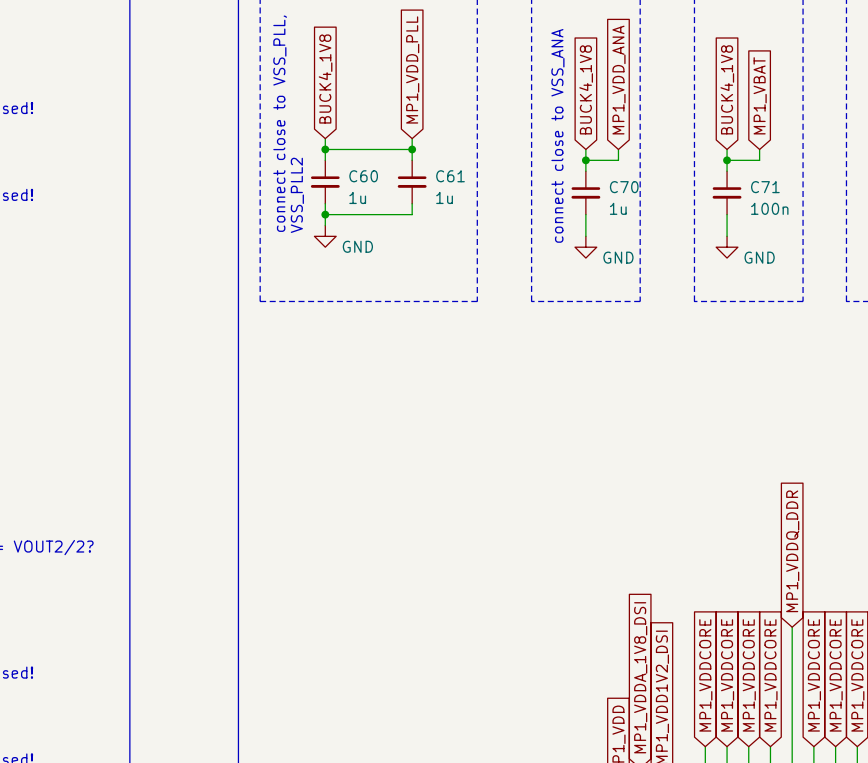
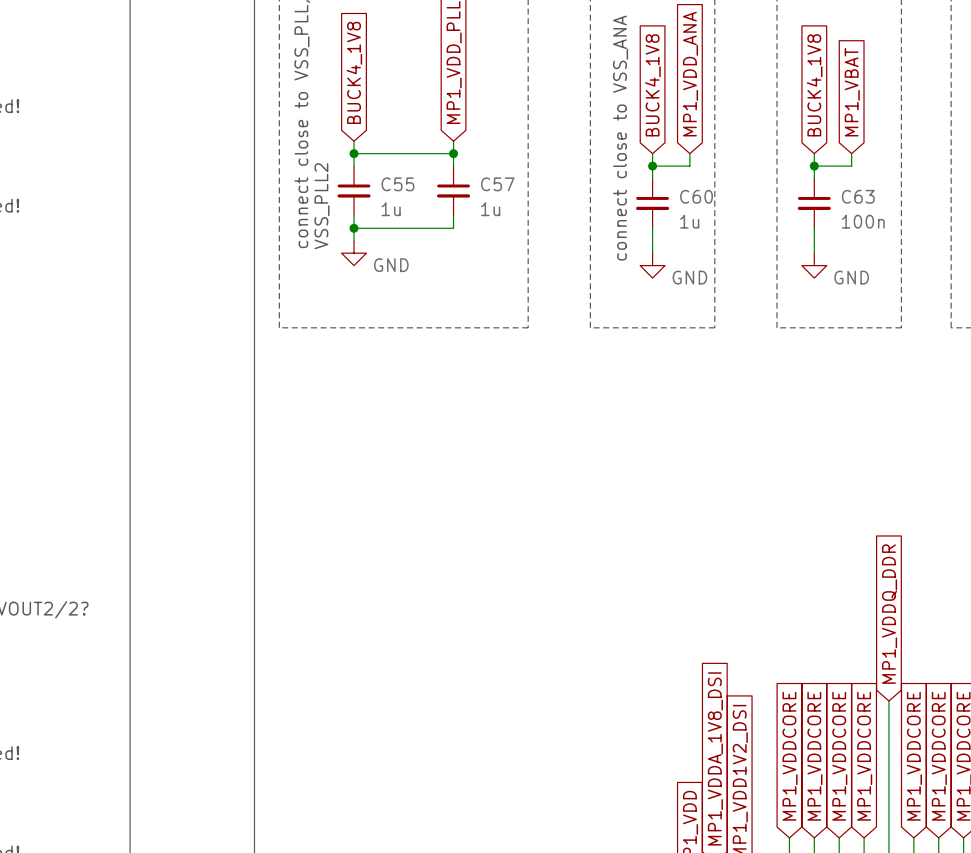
C60 name: C60 (363, 176) -> C55 (397, 184)
C61 name: C61 (450, 176) -> C57 (497, 184)
C70 name: C70 (624, 187) -> C60 (696, 196)
C71 name: C71 (765, 187) -> C63 (858, 196)

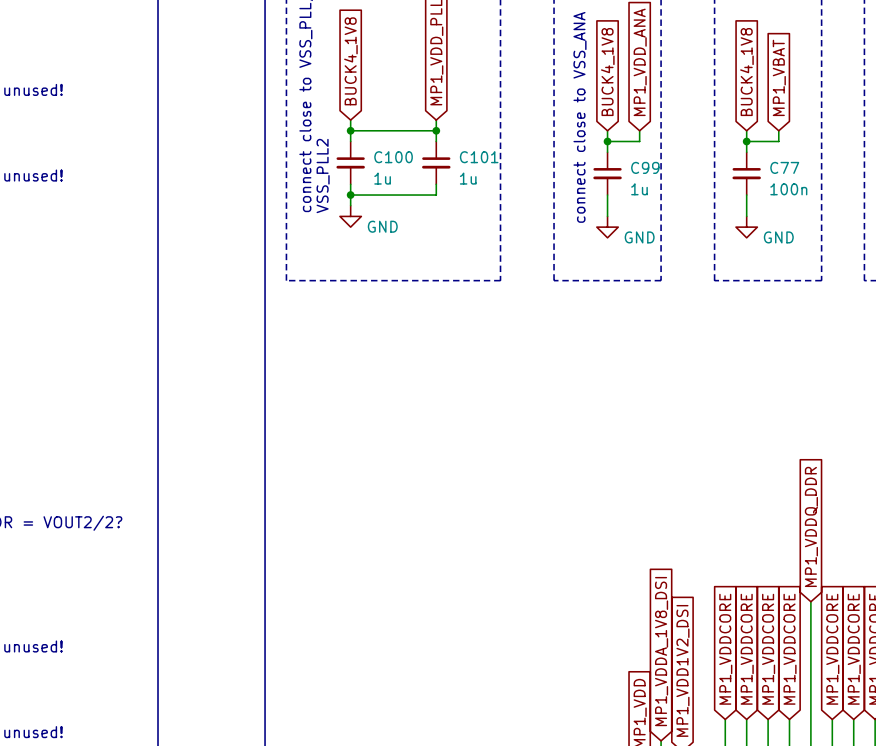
C55 name: C55 (397, 184) -> C100 (393, 157)
C57 name: C57 (497, 184) -> C101 (479, 157)
C60 name: C60 (696, 196) -> C99 (645, 167)
C63 name: C63 (858, 196) -> C77 (784, 167)

